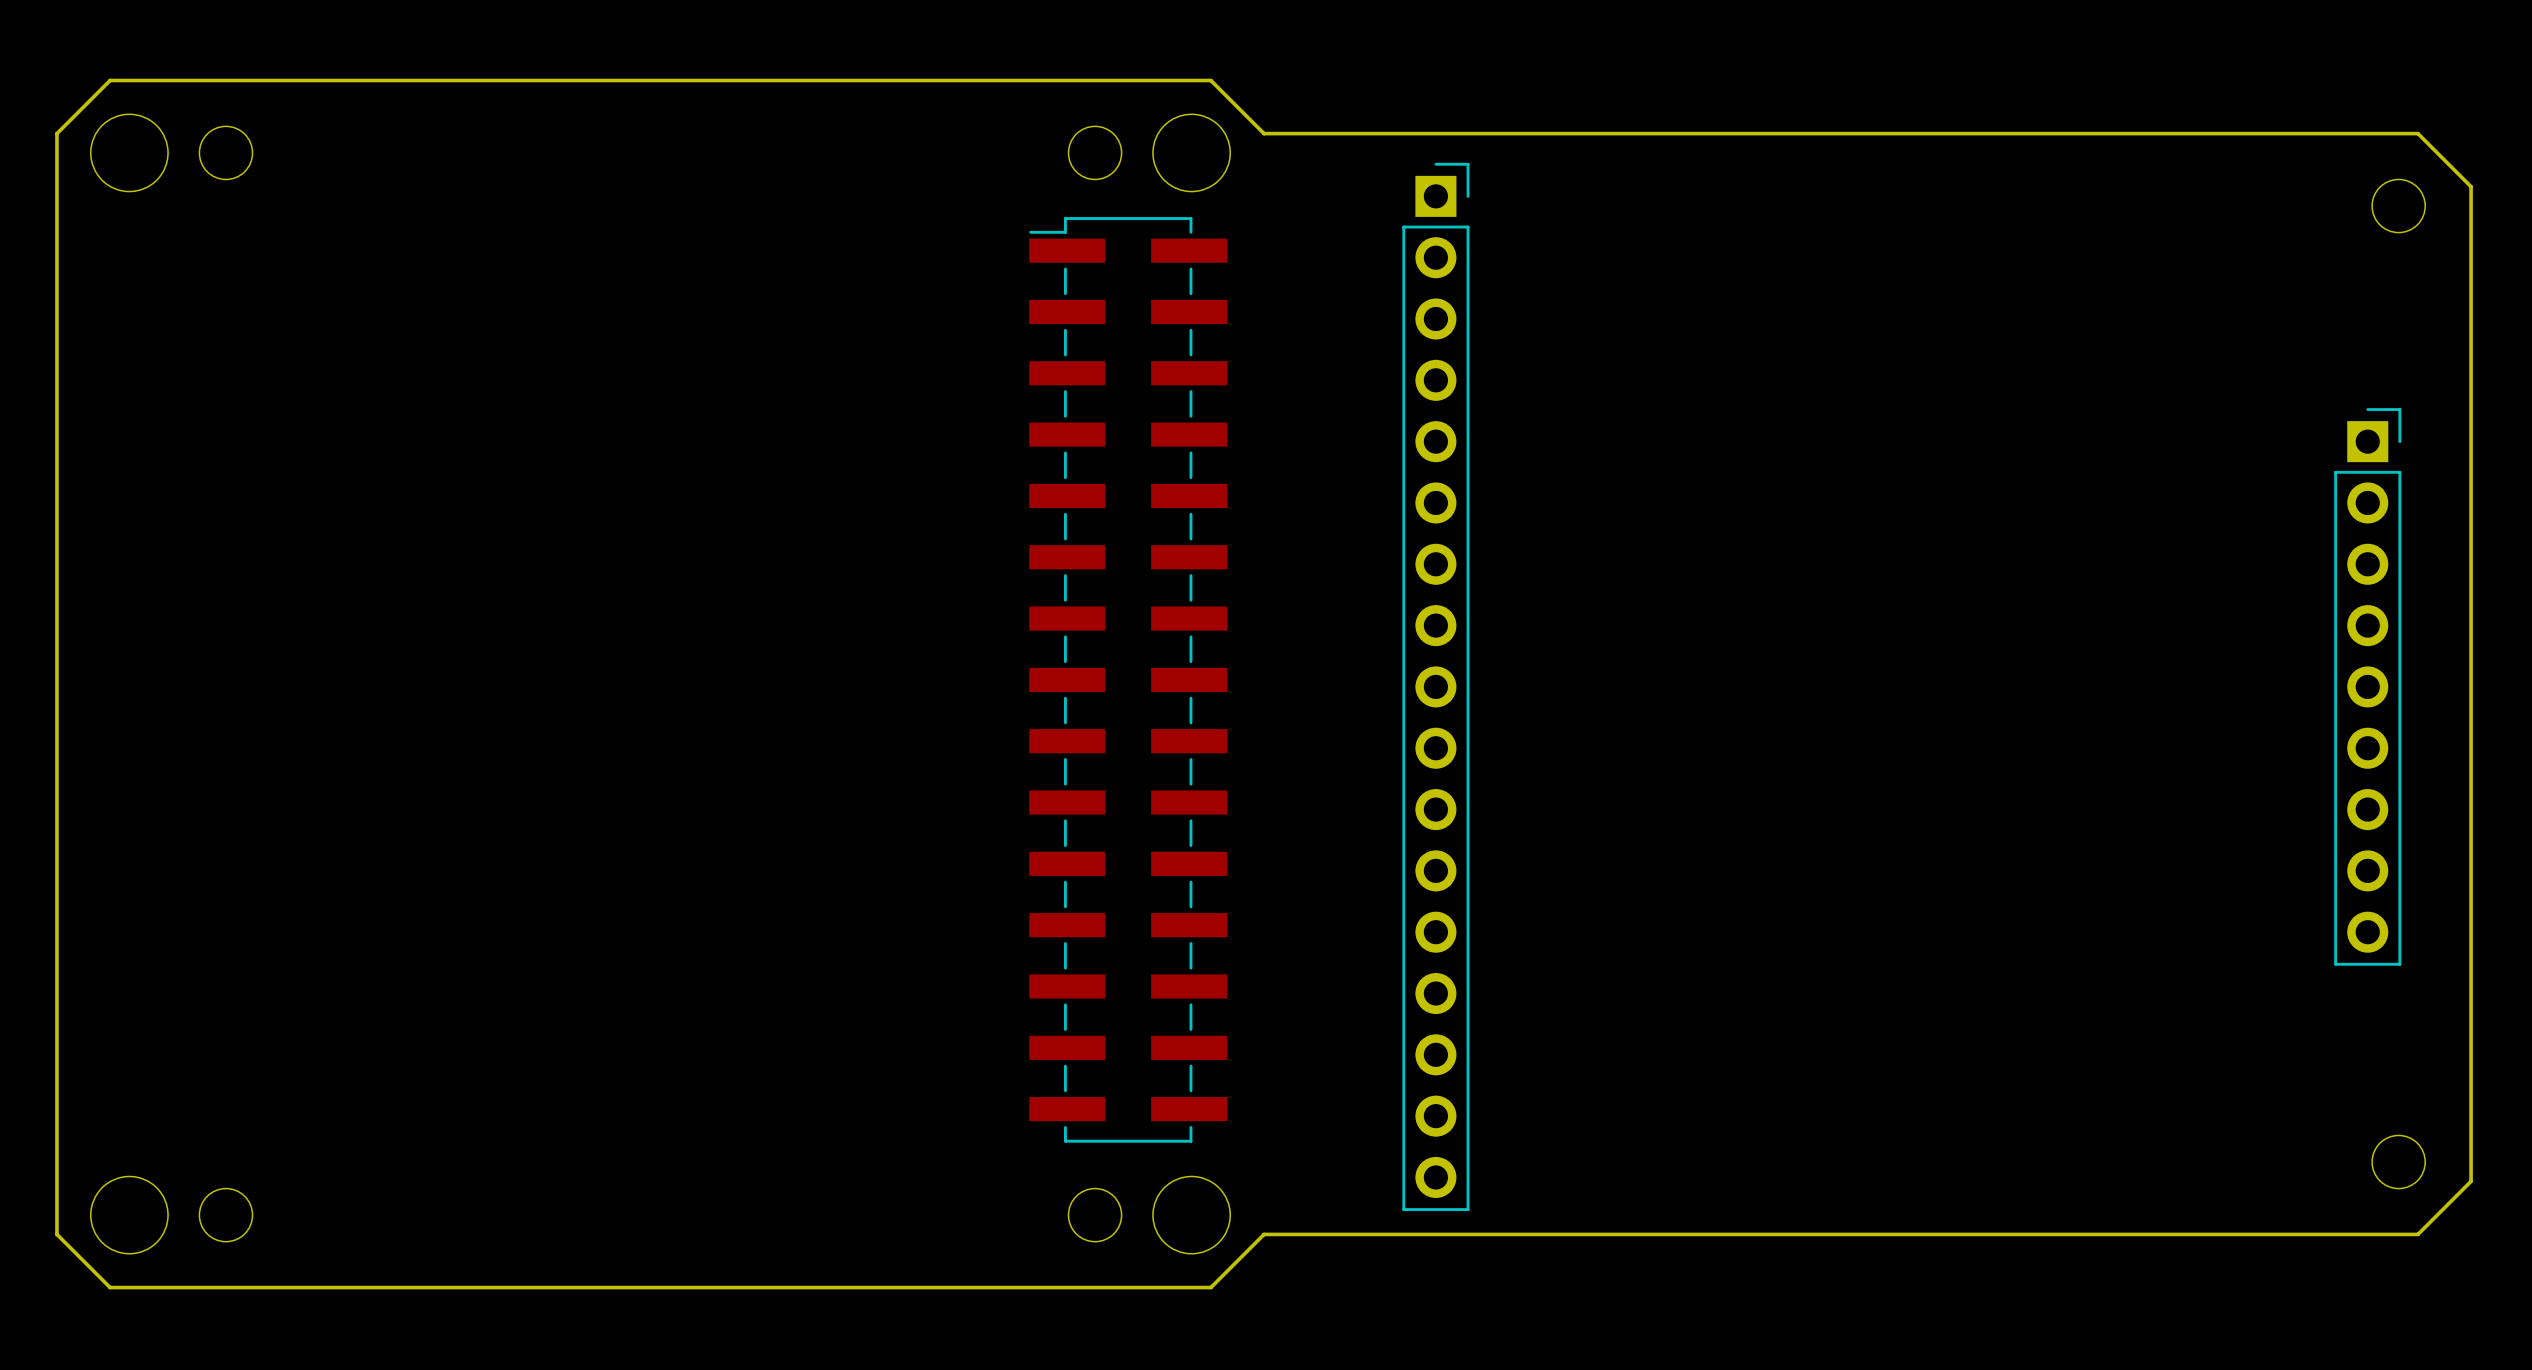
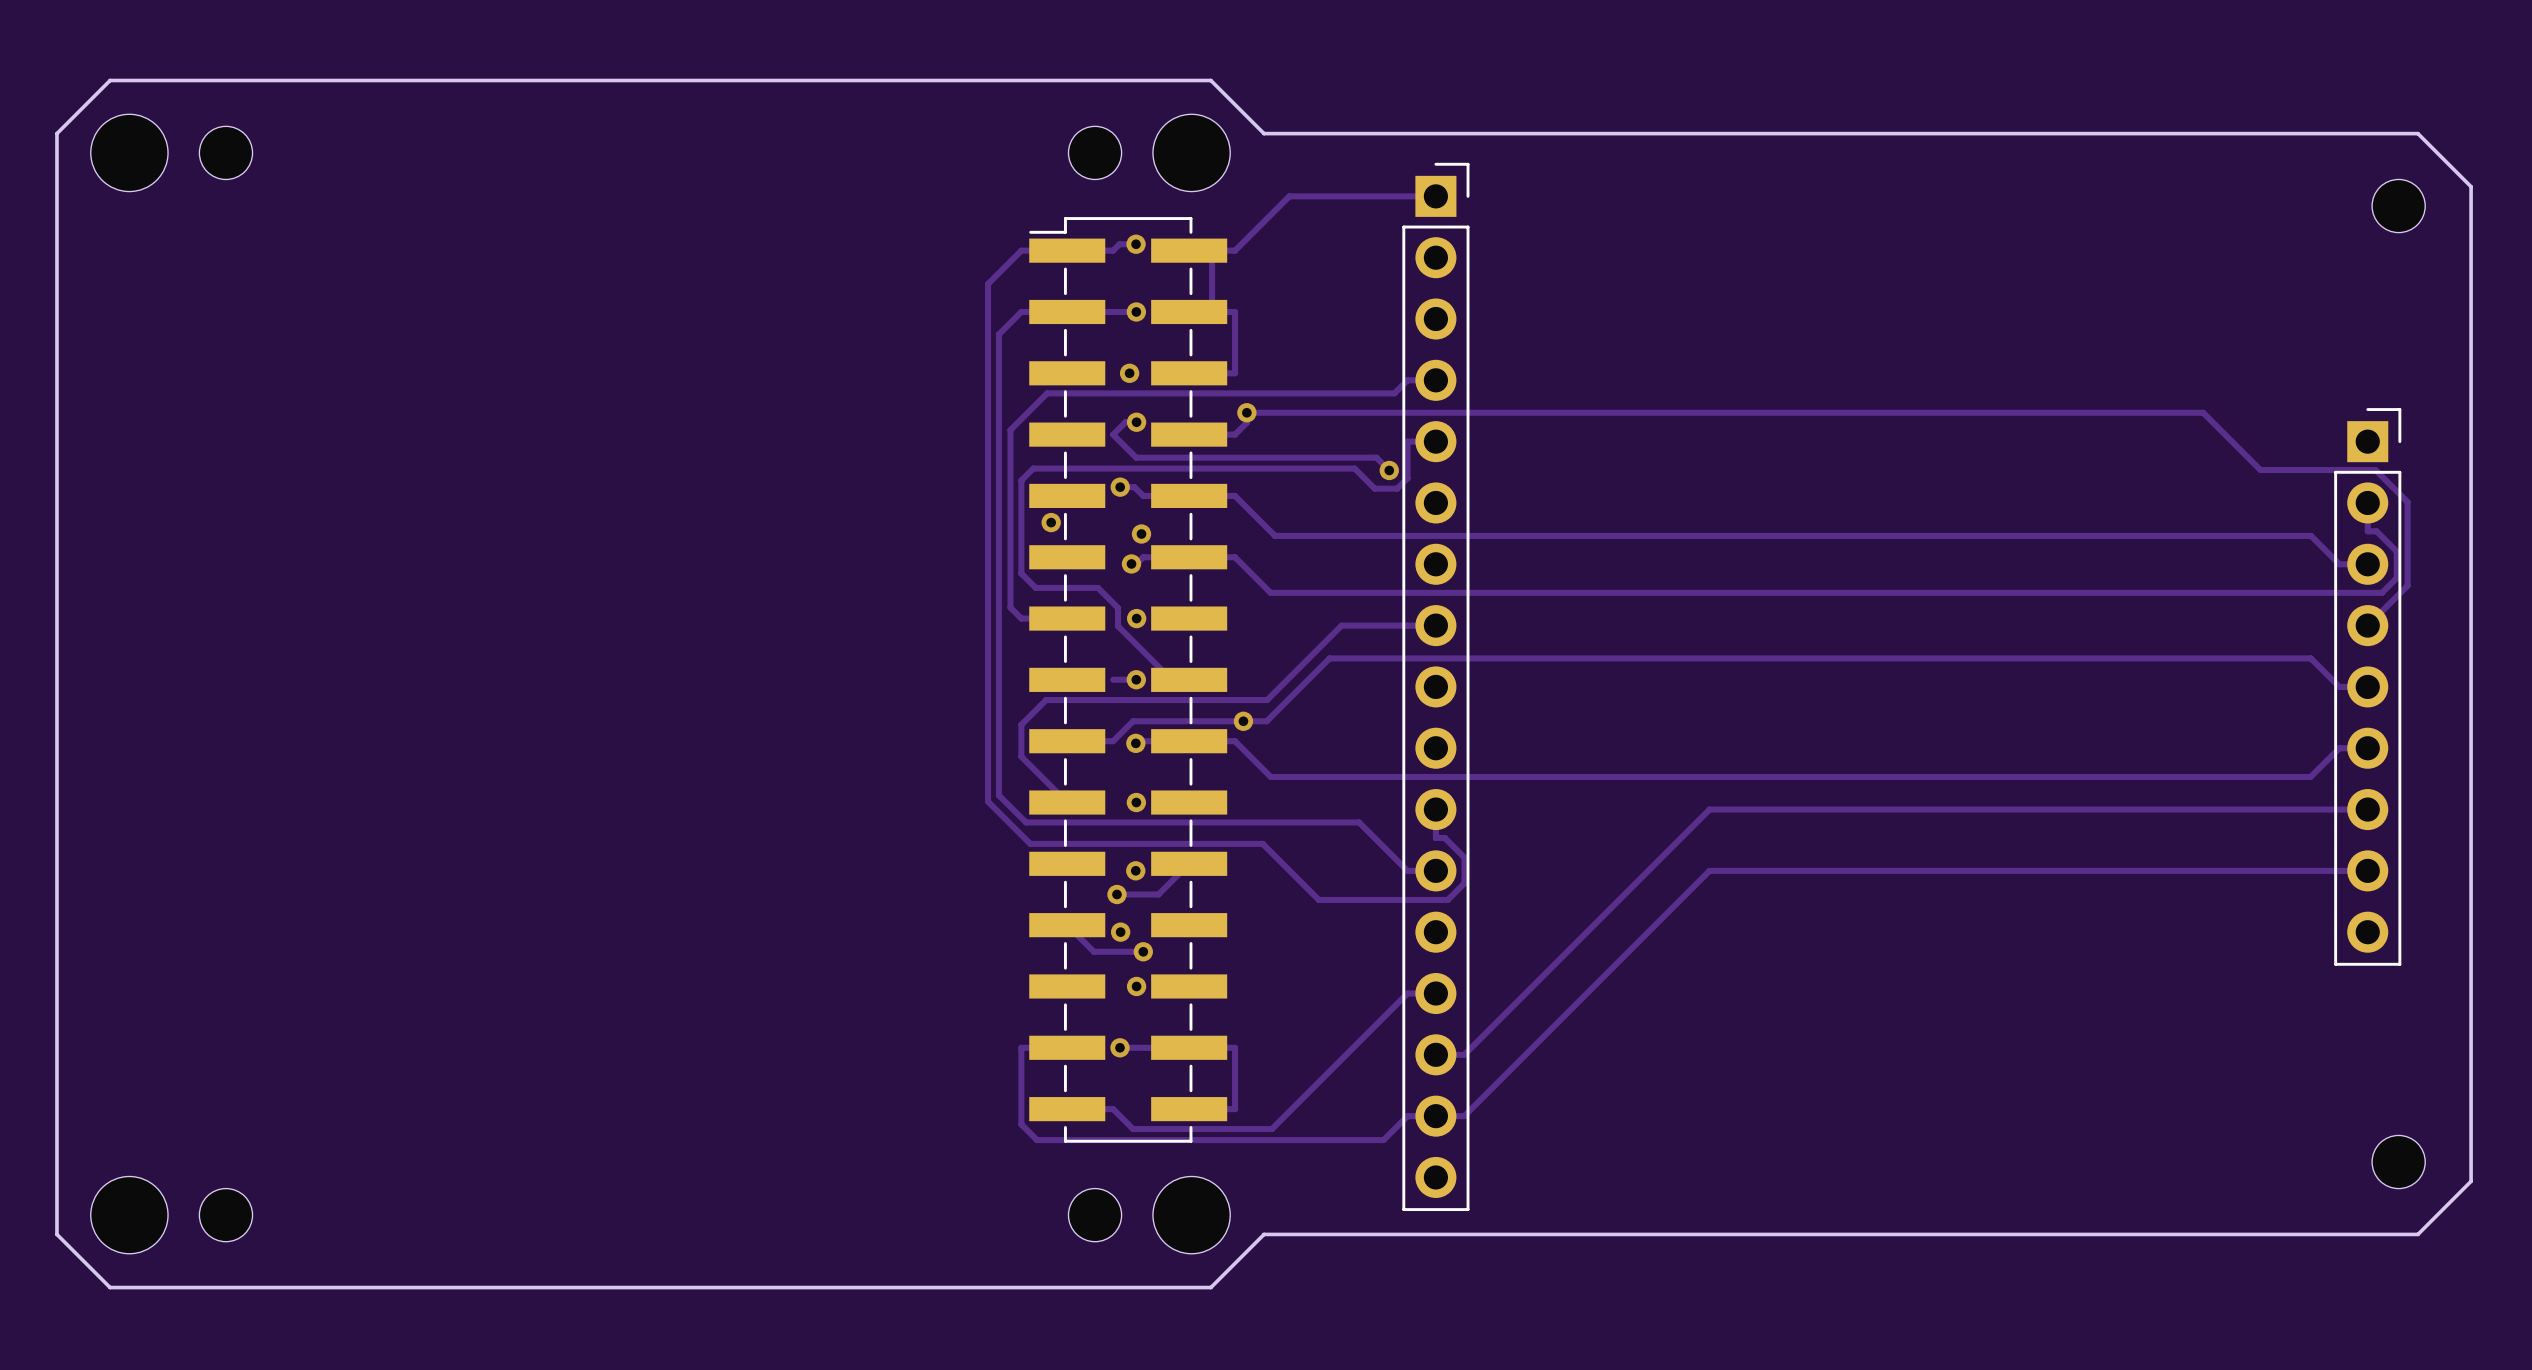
track: none -> (1435, 196) (1289, 196) (1235, 250) (1189, 250)
track: none -> (1136, 244) (1119, 244) (1113, 250) (1021, 250) (988, 283) (988, 801) (1030, 843) (1262, 843) (1318, 899) (1447, 899) (1464, 883) (1464, 857) (1444, 837) (1435, 837) (1435, 809)
via: none -> (1136, 244)
track: none -> (1212, 250) (1212, 311)
track: none -> (1136, 311) (1021, 311) (998, 334) (998, 795) (1025, 822) (1359, 822) (1407, 870) (1435, 870)
via: none -> (1136, 311)
track: none -> (1189, 311) (1235, 311) (1235, 373) (1189, 373)
via: none -> (1129, 373)
track: none -> (1435, 380) (1407, 380) (1394, 393) (1047, 393) (1010, 430) (1010, 607) (1021, 618) (1067, 618)
via: none -> (1246, 412)
track: none -> (1136, 422) (1125, 422) (1113, 434) (1136, 457) (1376, 457) (1389, 470)
via: none -> (1136, 422)
track: none -> (1189, 434) (1235, 434) (1246, 422) (1246, 412) (2203, 412) (2260, 470) (2375, 470) (2407, 502) (2407, 585) (2367, 625)
track: none -> (1435, 441) (1407, 441) (1407, 478) (1397, 488) (1374, 488) (1354, 468) (1033, 468) (1021, 480) (1021, 573) (1035, 587) (1097, 587) (1118, 607) (1118, 626) (1171, 679) (1189, 679)
via: none -> (1389, 470)
track: none -> (1120, 487) (1134, 487) (1143, 495) (1235, 495) (1275, 535) (2311, 535) (2339, 564) (2367, 564)
via: none -> (1120, 487)
track: none -> (2367, 502) (2367, 531) (2376, 531) (2396, 551) (2396, 578) (2382, 592) (1270, 592) (1235, 557) (1143, 557) (1136, 563) (1131, 563)
via: none -> (1051, 522)
via: none -> (1141, 534)
via: none -> (1131, 563)
via: none -> (1136, 618)
track: none -> (1435, 625) (1341, 625) (1267, 700) (1046, 700) (1021, 724) (1021, 756) (1067, 802)
track: none -> (1113, 679) (1136, 679)
via: none -> (1136, 679)
track: none -> (2367, 686) (2339, 686) (2310, 658) (1329, 658) (1266, 721) (1133, 721) (1113, 741) (1067, 741)
via: none -> (1243, 721)
track: none -> (1135, 743) (1138, 741) (1235, 741) (1270, 776) (2310, 776) (2339, 748) (2367, 748)
via: none -> (1135, 743)
via: none -> (1136, 802)
track: none -> (2367, 809) (1709, 809) (1464, 1054) (1435, 1054)
track: none -> (1189, 863) (1158, 894) (1116, 894)
via: none -> (1135, 870)
track: none -> (2367, 870) (1709, 870) (1464, 1116) (1407, 1116) (1383, 1140) (1037, 1140) (1021, 1124) (1021, 1047) (1067, 1047)
via: none -> (1116, 894)
track: none -> (1067, 925) (1093, 951) (1143, 951)
via: none -> (1120, 932)
via: none -> (1143, 951)
via: none -> (1136, 986)
track: none -> (1435, 993) (1407, 993) (1272, 1129) (1133, 1129) (1113, 1109) (1067, 1109)
track: none -> (1120, 1047) (1235, 1047) (1235, 1109) (1189, 1109)
via: none -> (1120, 1047)

